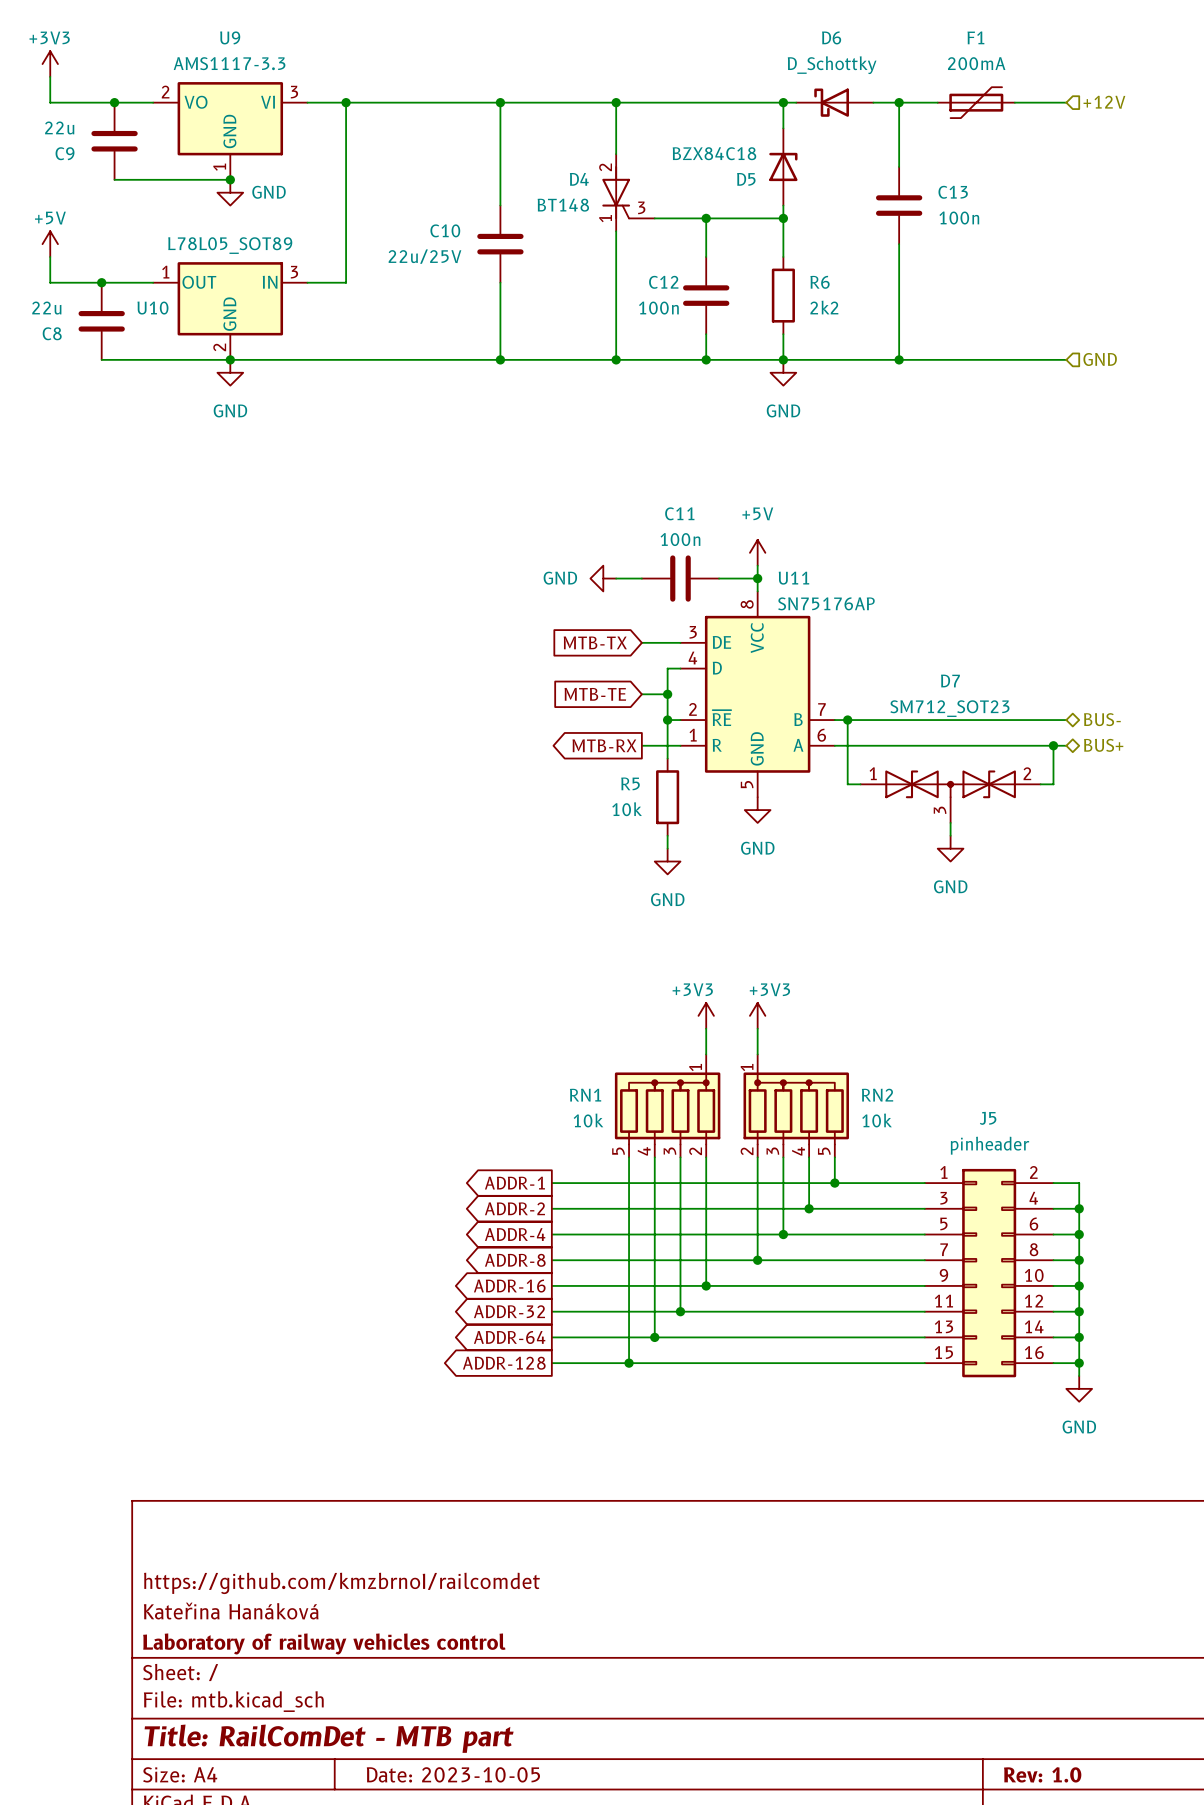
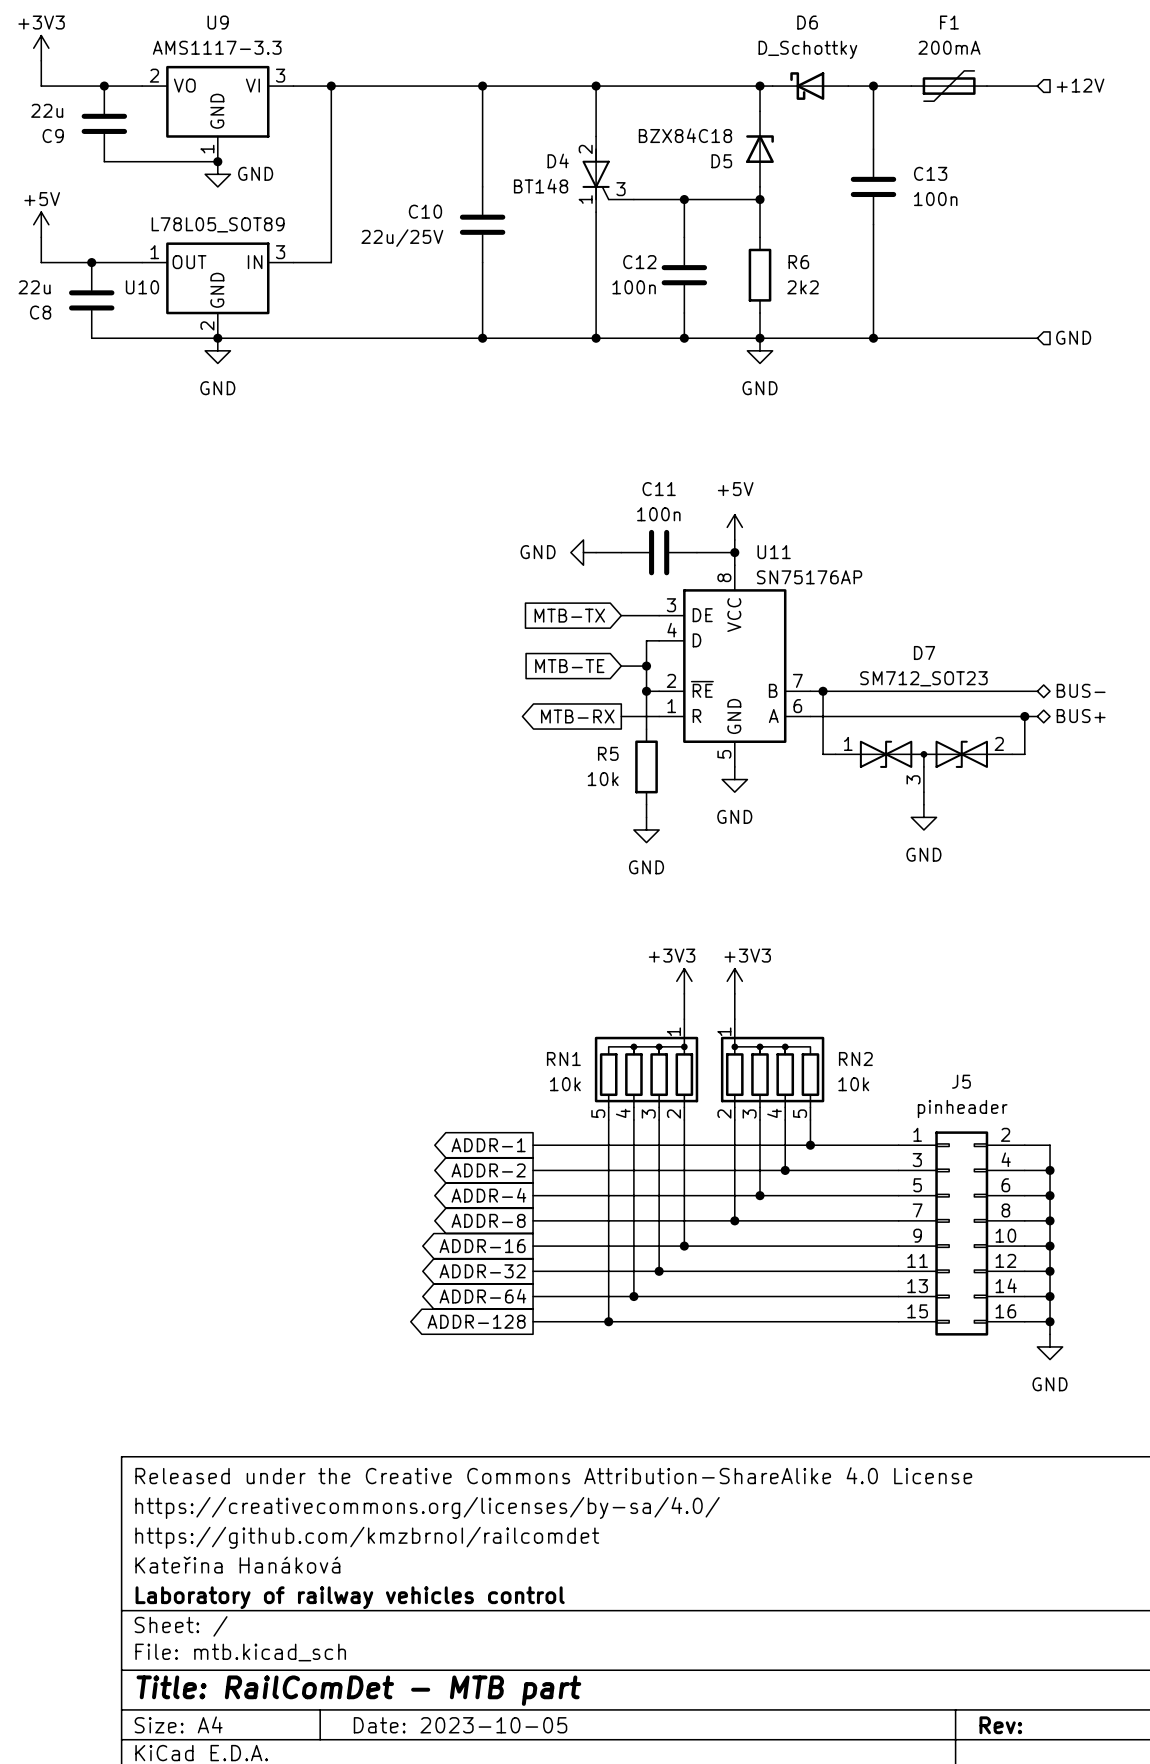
title block: none -> Released under the Creative Commons Attribution-ShareAlike 4.0 License (553, 1475)
title block: none -> https://creativecommons.org/licenses/by-sa/4.0/ (427, 1507)
title block: Rev: 1.0 (1042, 1774) -> Rev: (1000, 1725)

